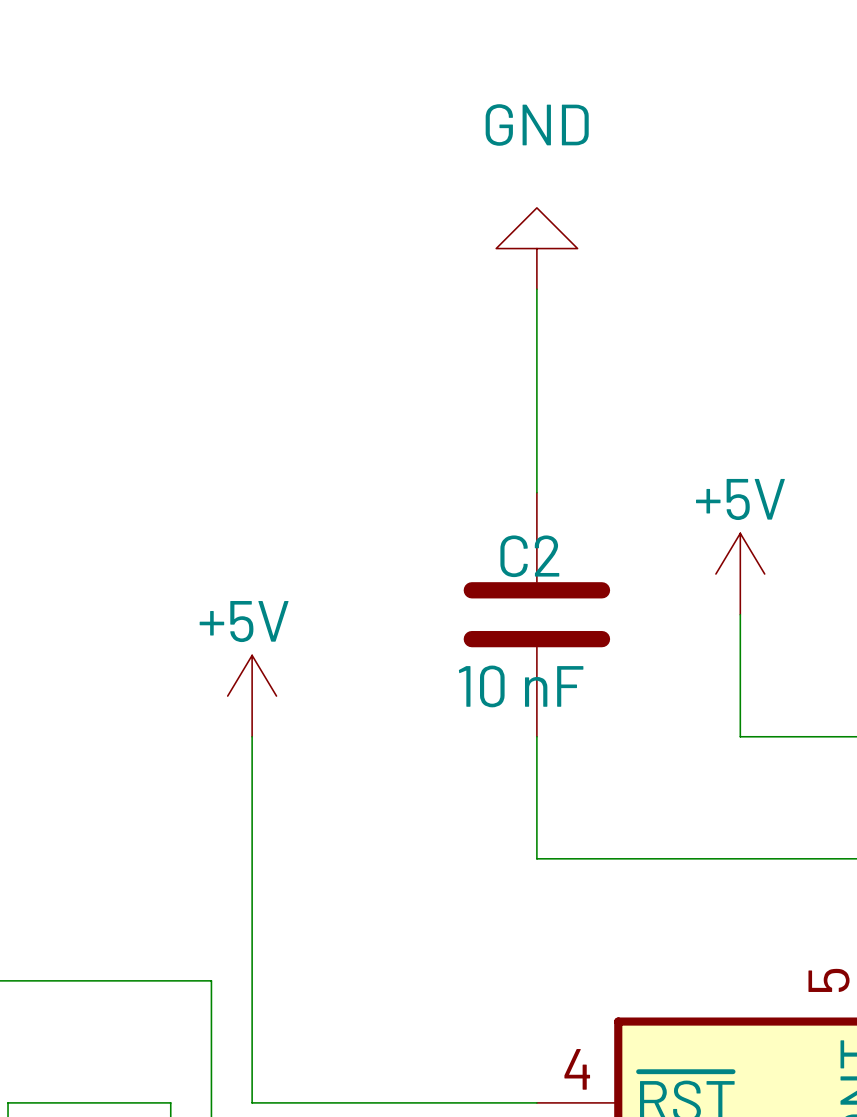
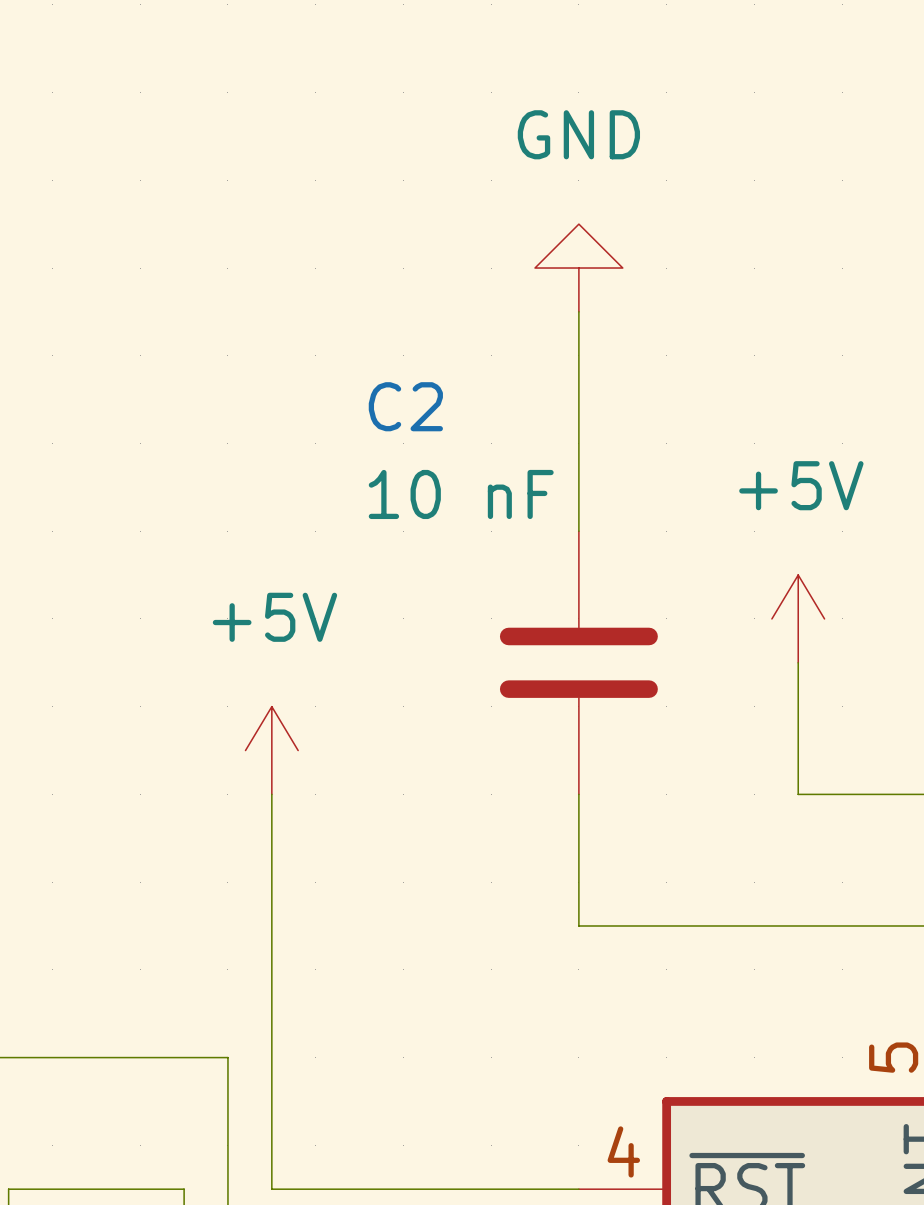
power symbol text position: +5V (740, 499) -> +5V (801, 485)
C2 name position: C2 (529, 556) -> C2 (405, 406)
power symbol text position: +5V (244, 621) -> +5V (274, 617)
C2 value position: 10 nF (521, 686) -> 10 nF (461, 494)

